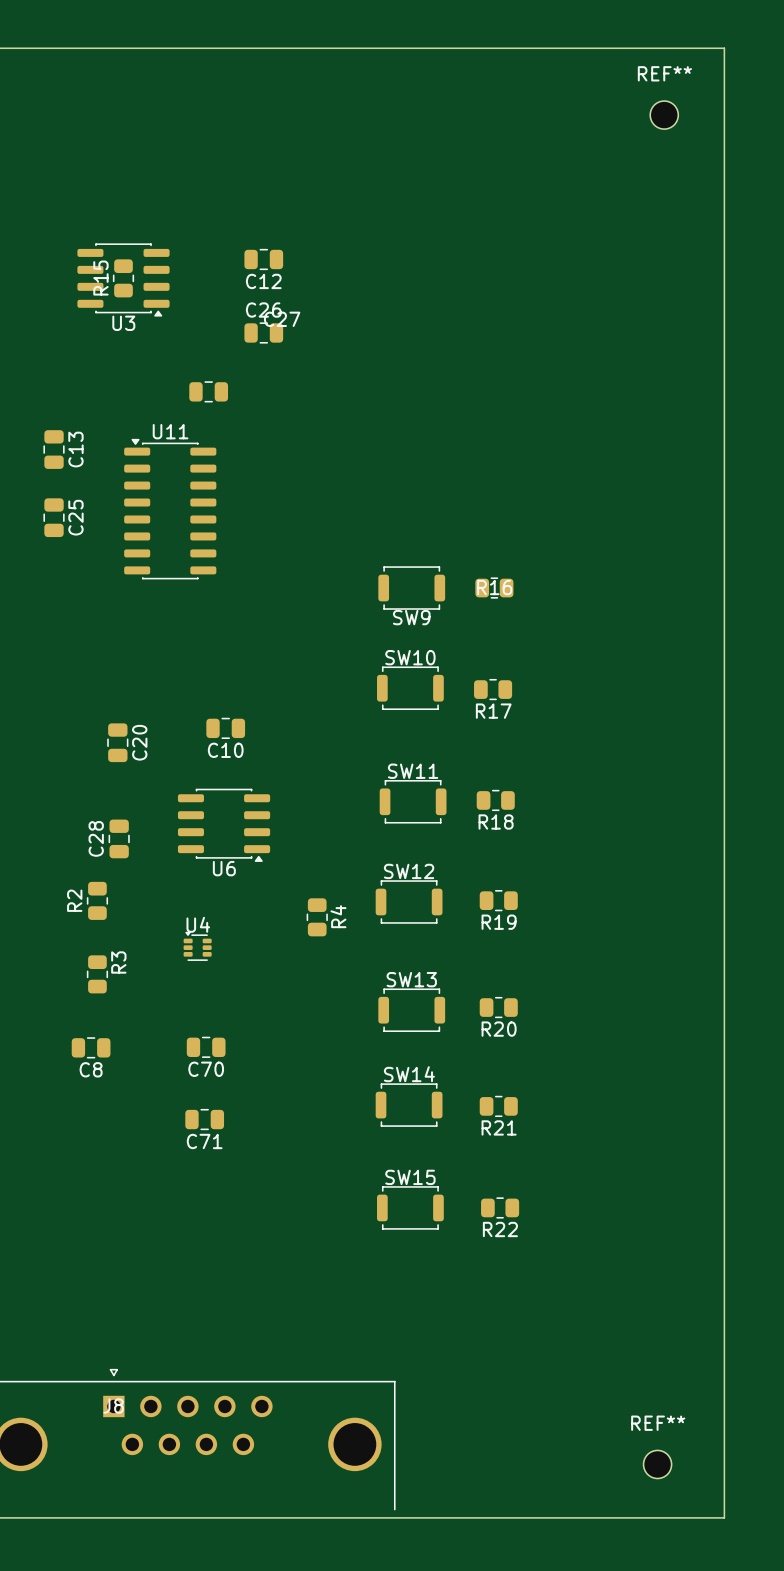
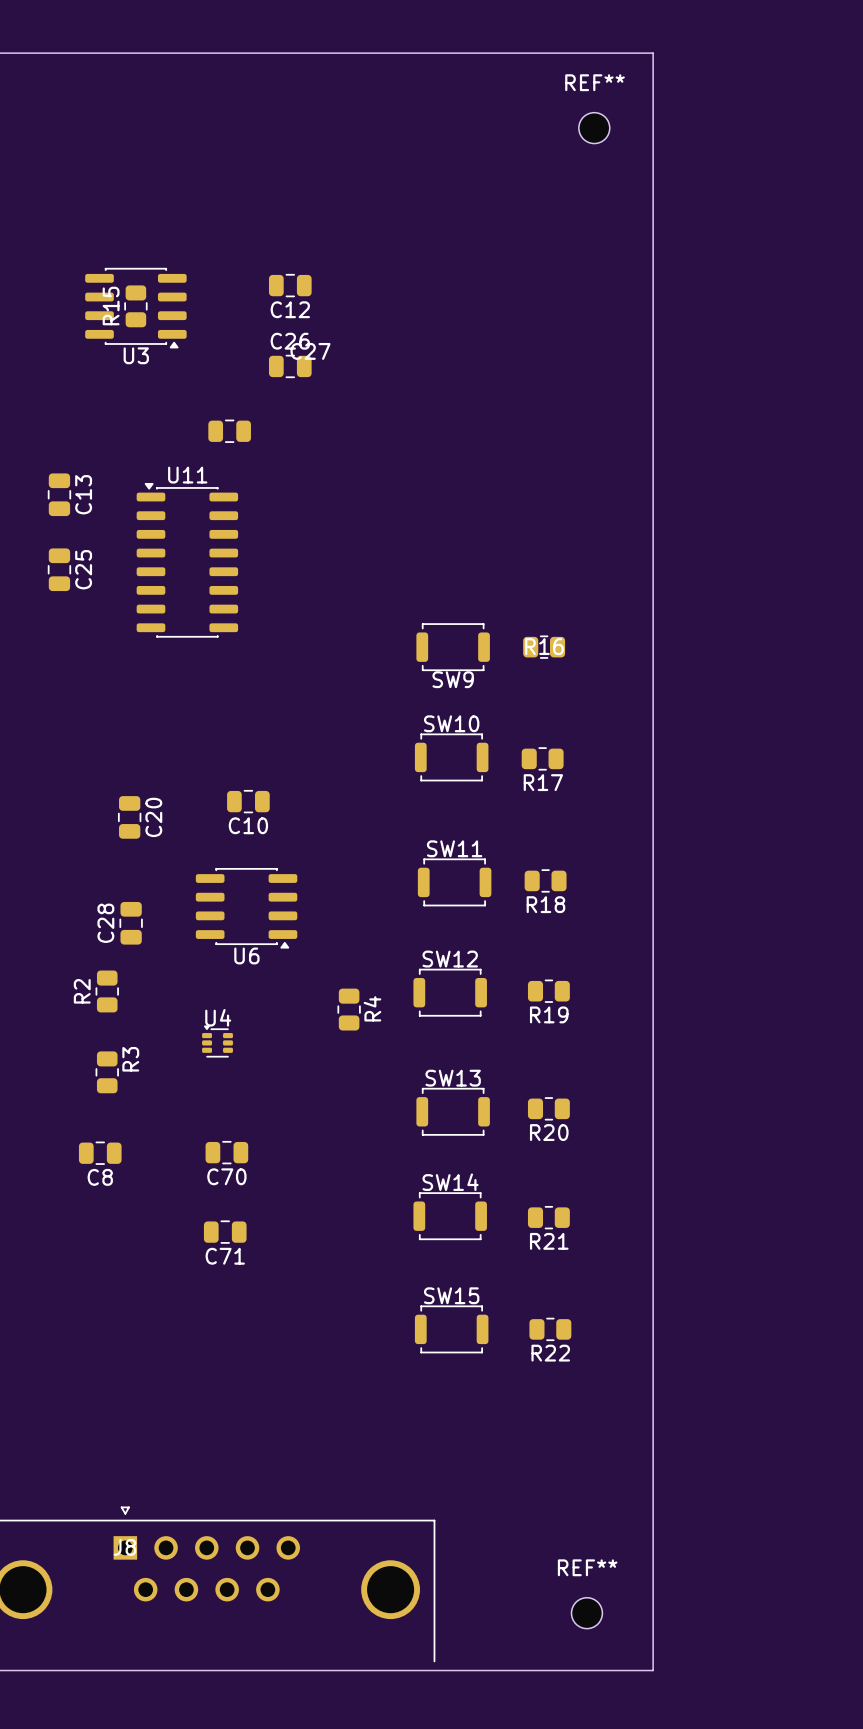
board edge: (593, 48) (724, 48) (724, 1517) (593, 1517) -> (653, 53) (653, 1670)
REF** position: (664, 115) -> (594, 128)
REF** position: (657, 1464) -> (586, 1613)

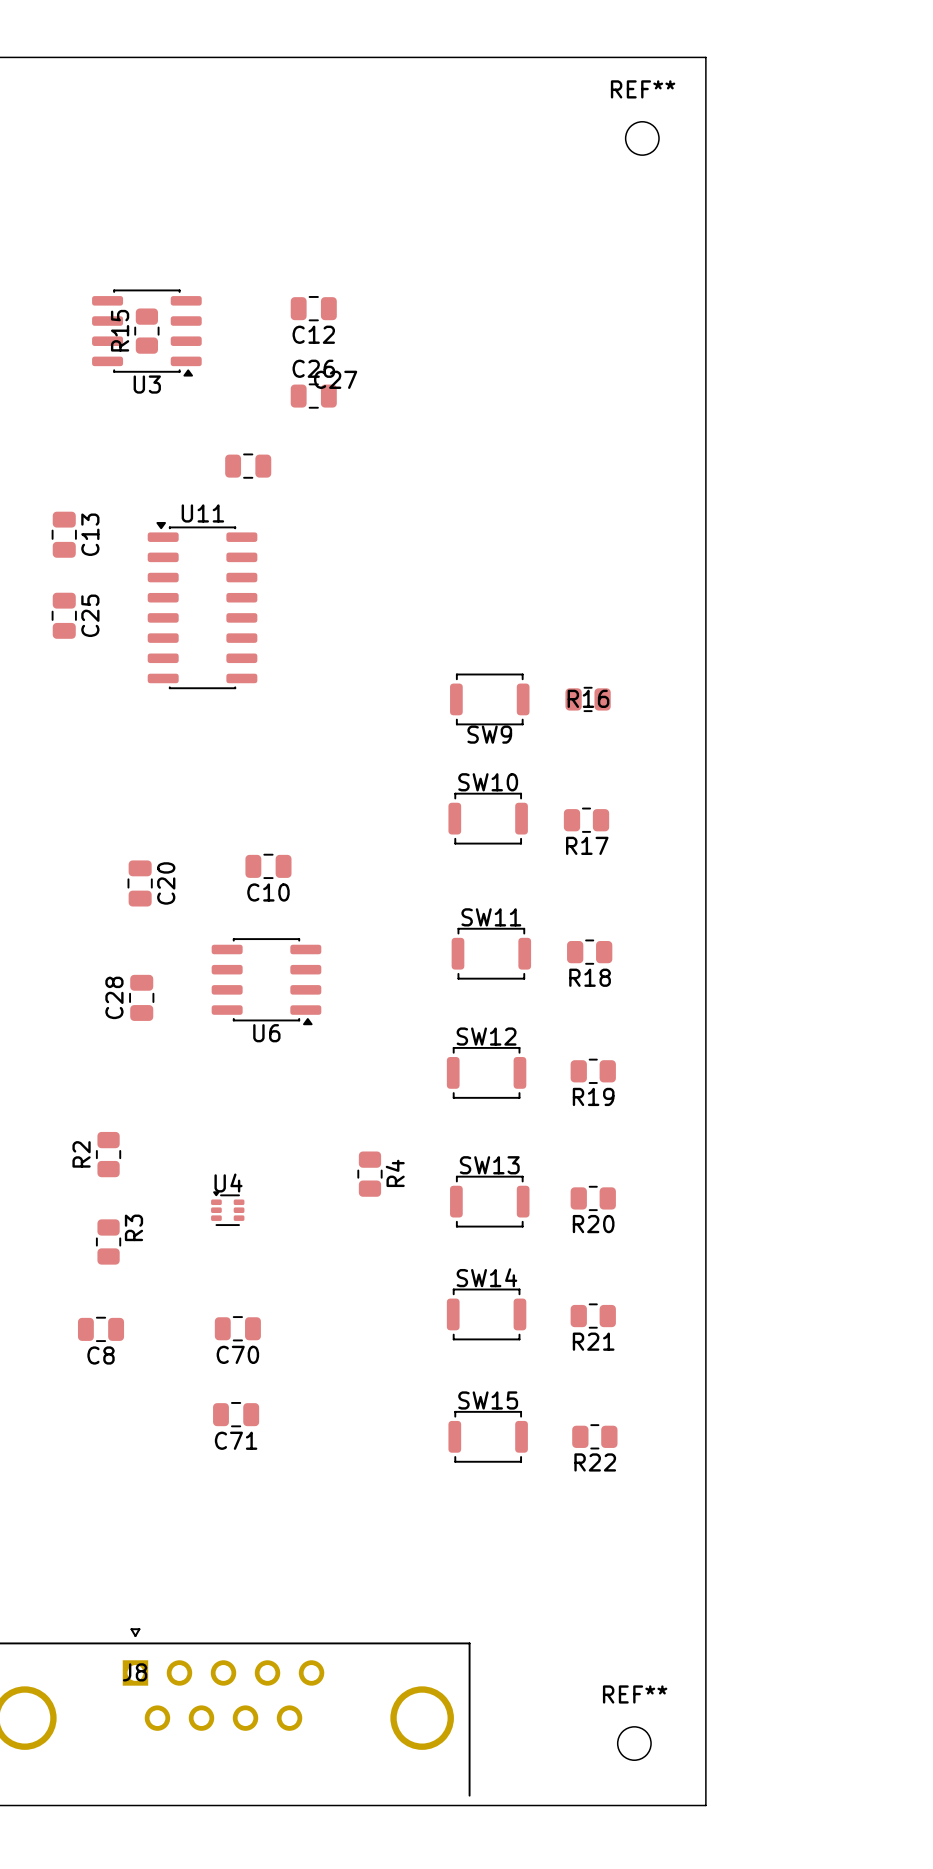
R2 position: (107, 991) -> (108, 1154)
R4 position: (349, 1009) -> (369, 1174)
U4 position: (217, 1041) -> (227, 1208)
R3 position: (107, 1072) -> (108, 1241)
C70 position: (226, 1152) -> (237, 1328)
C8 position: (100, 1153) -> (101, 1329)
C71 position: (225, 1232) -> (236, 1414)

